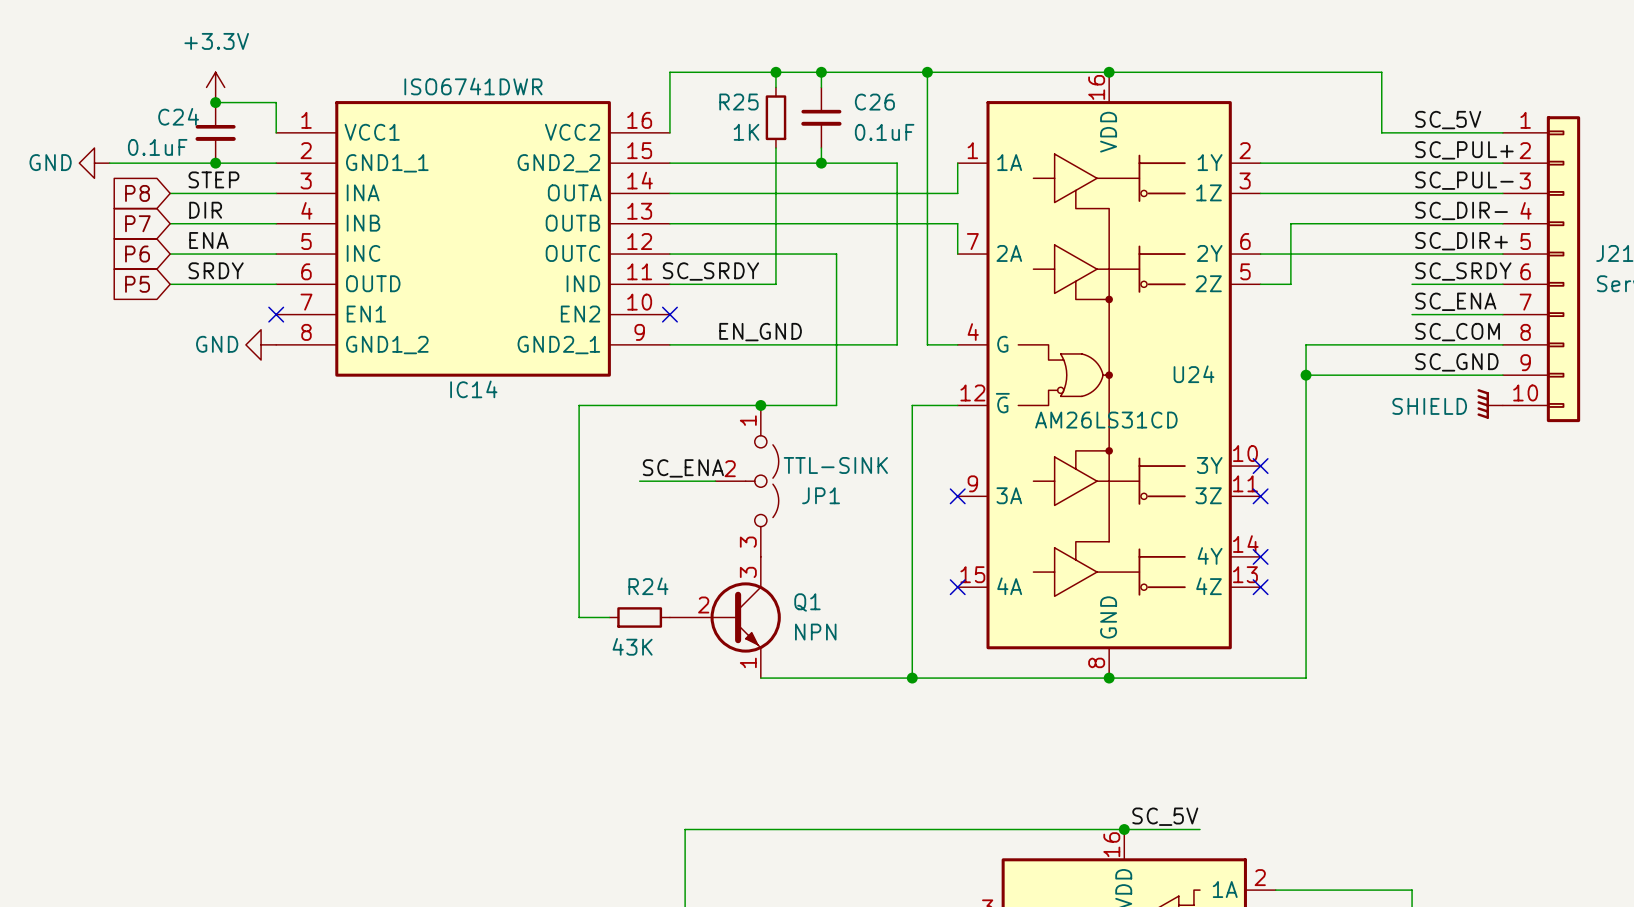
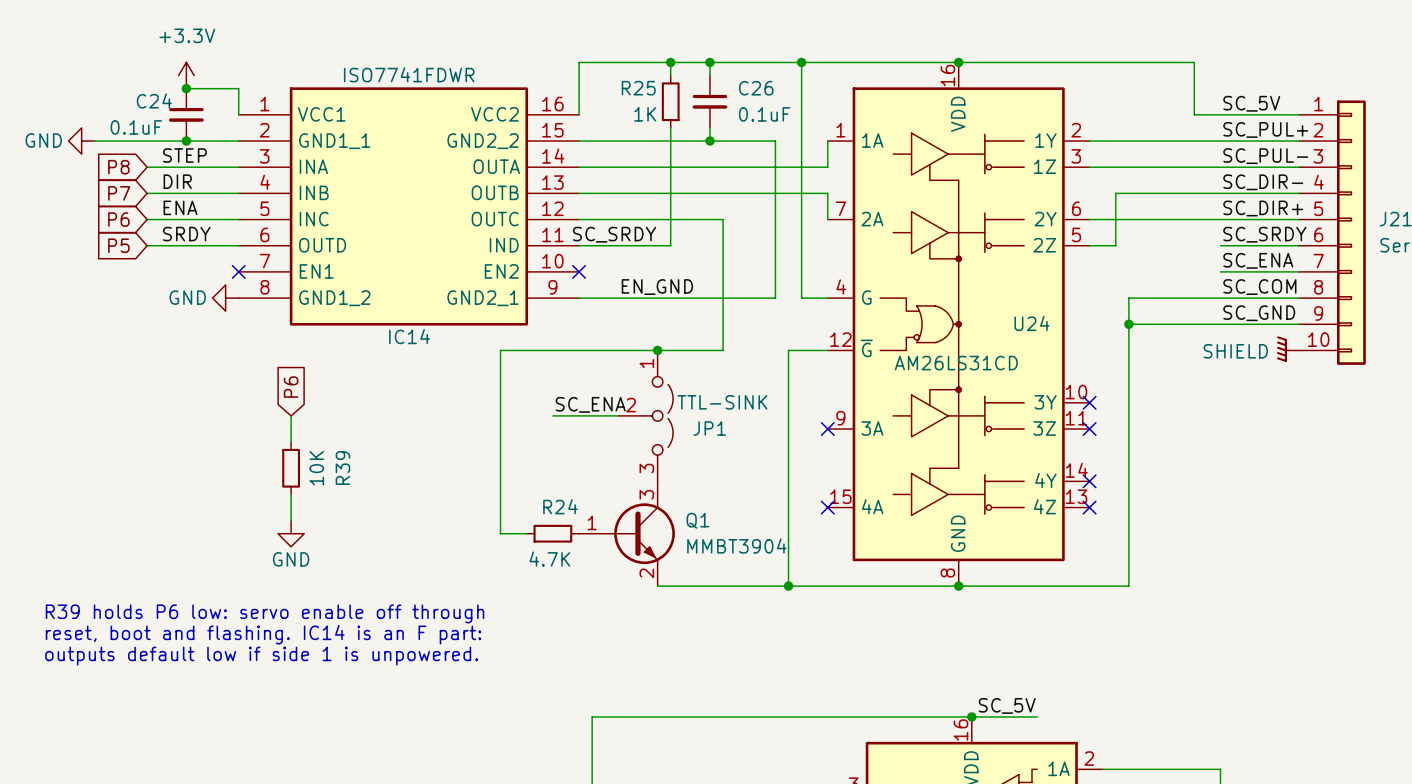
IC14 value: ISO6741DWR (473, 86) -> ISO7741FDWR (409, 74)
global label: none -> P6 (291, 387)
wire: none -> (291, 415) (291, 442)
R39: none -> 10K (291, 468)
Q1 symbol: [669, 556, 781, 679] -> [579, 481, 675, 587]
wire: none -> (291, 494) (291, 520)
power symbol: none -> GND (291, 533)
Q1 value: NPN (815, 632) -> MMBT3904 (736, 546)
R24 value: 43K (632, 646) -> 4.7K (549, 559)
text: none -> R39 holds P6 low: servo enable off through (265, 613)
text: none -> reset, boot and flashing. IC14 is an F part: (263, 634)
text: none -> outputs default low if side 1 is unpowered. (261, 656)

